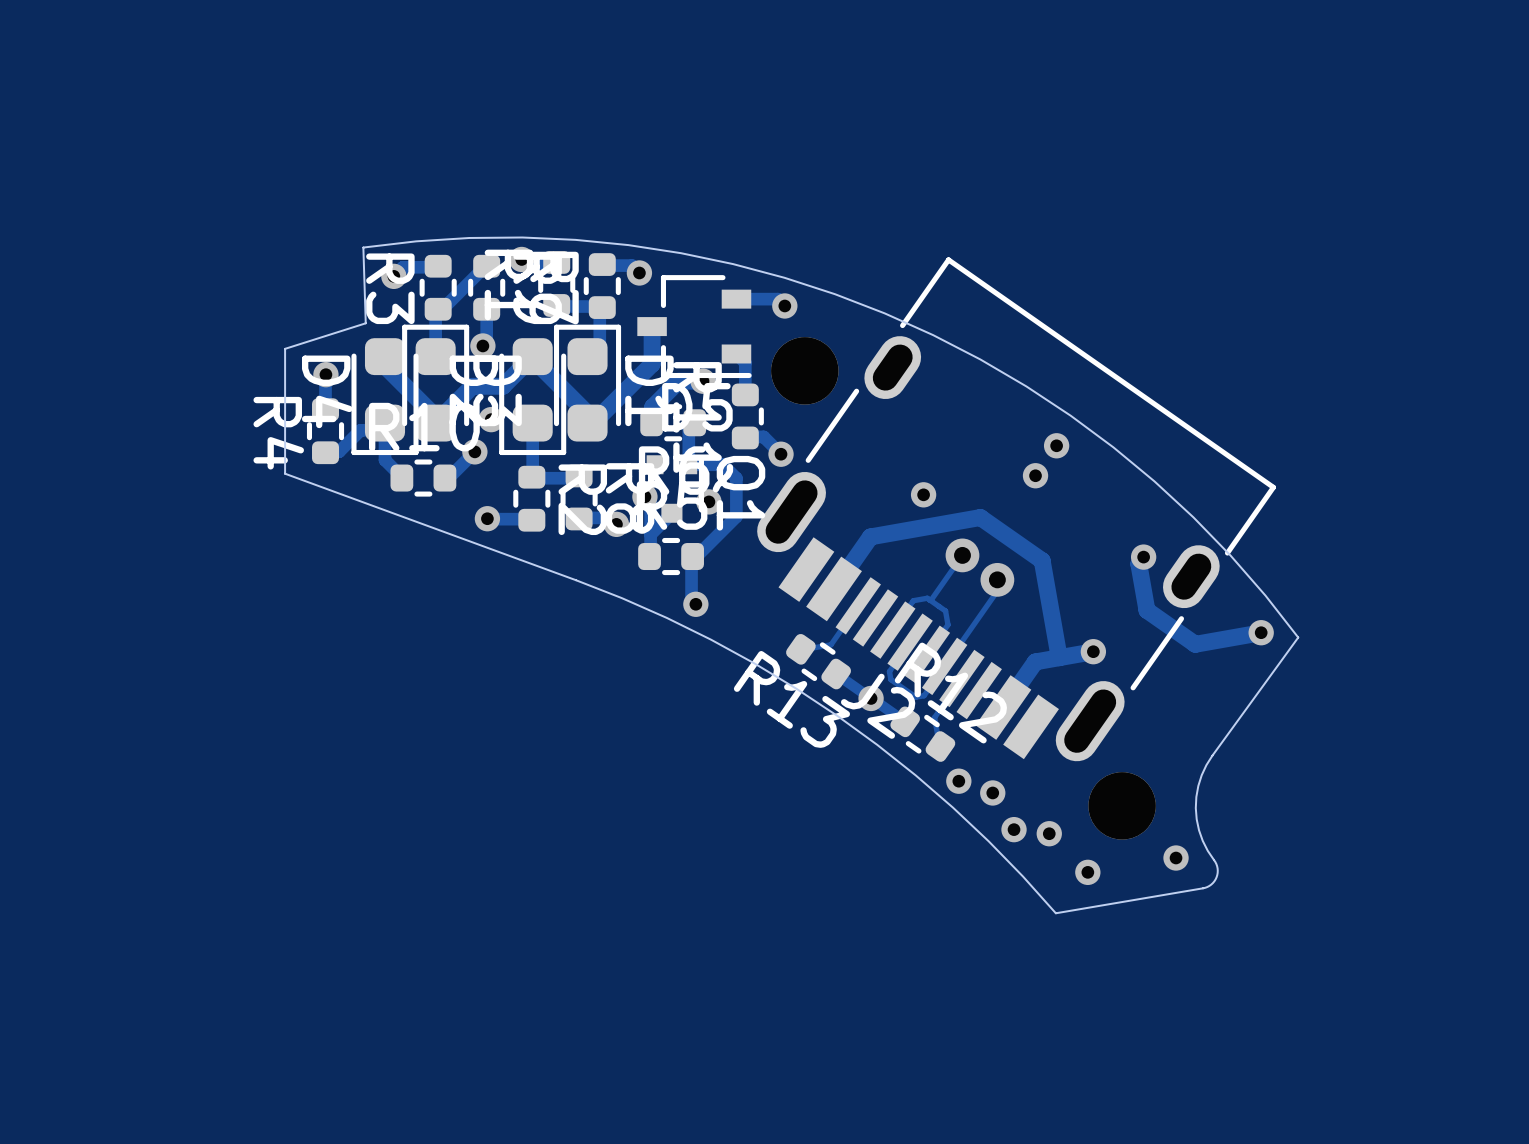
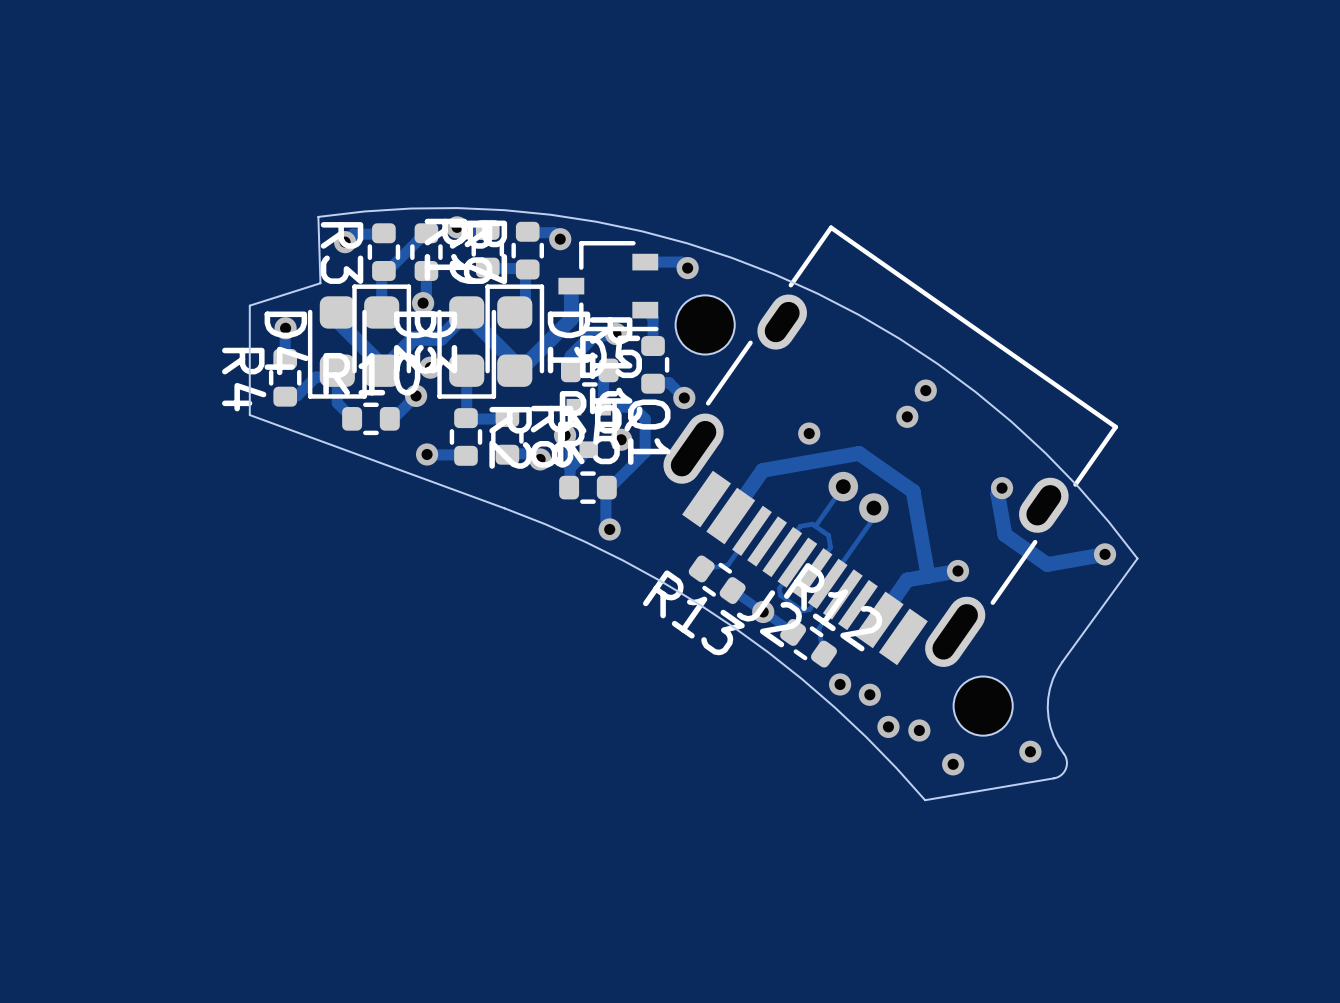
part footprint: [771, 337, 839, 405] -> [675, 295, 735, 355]
part footprint: [1088, 772, 1156, 840] -> [953, 676, 1013, 736]

